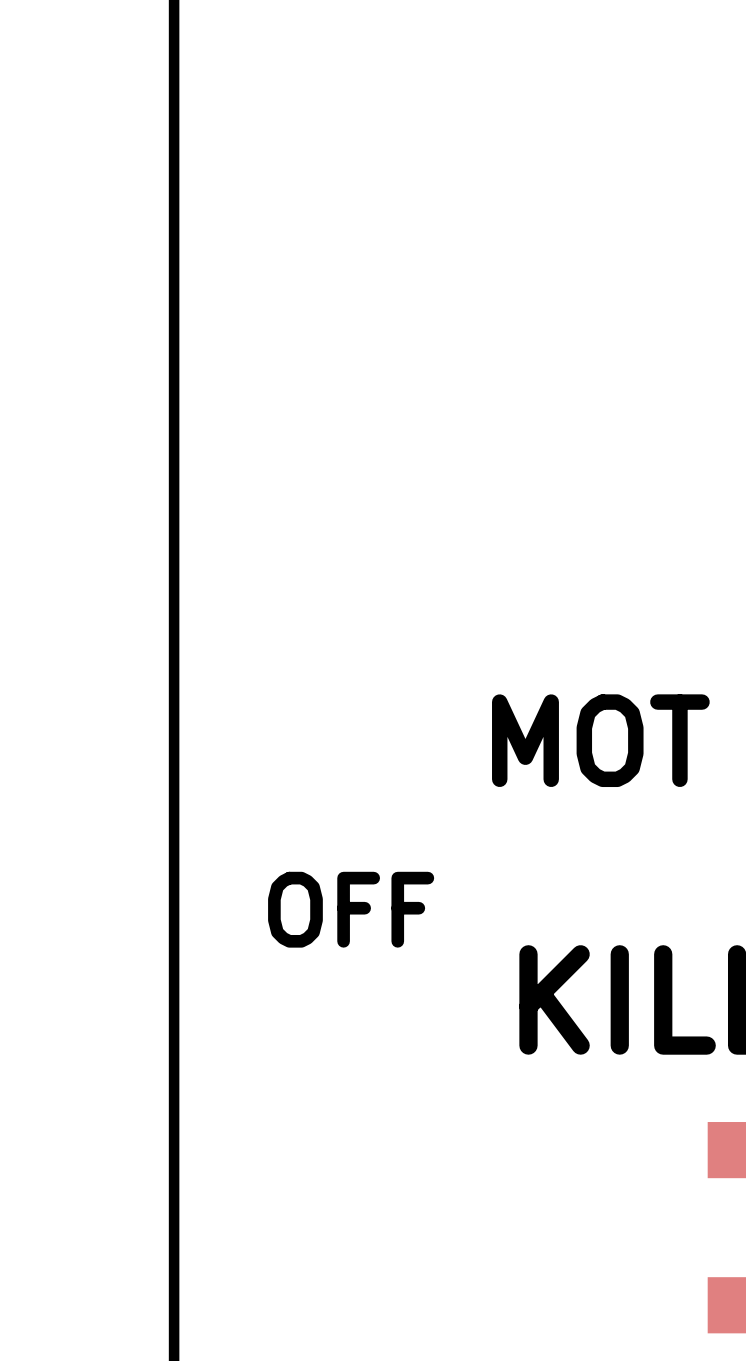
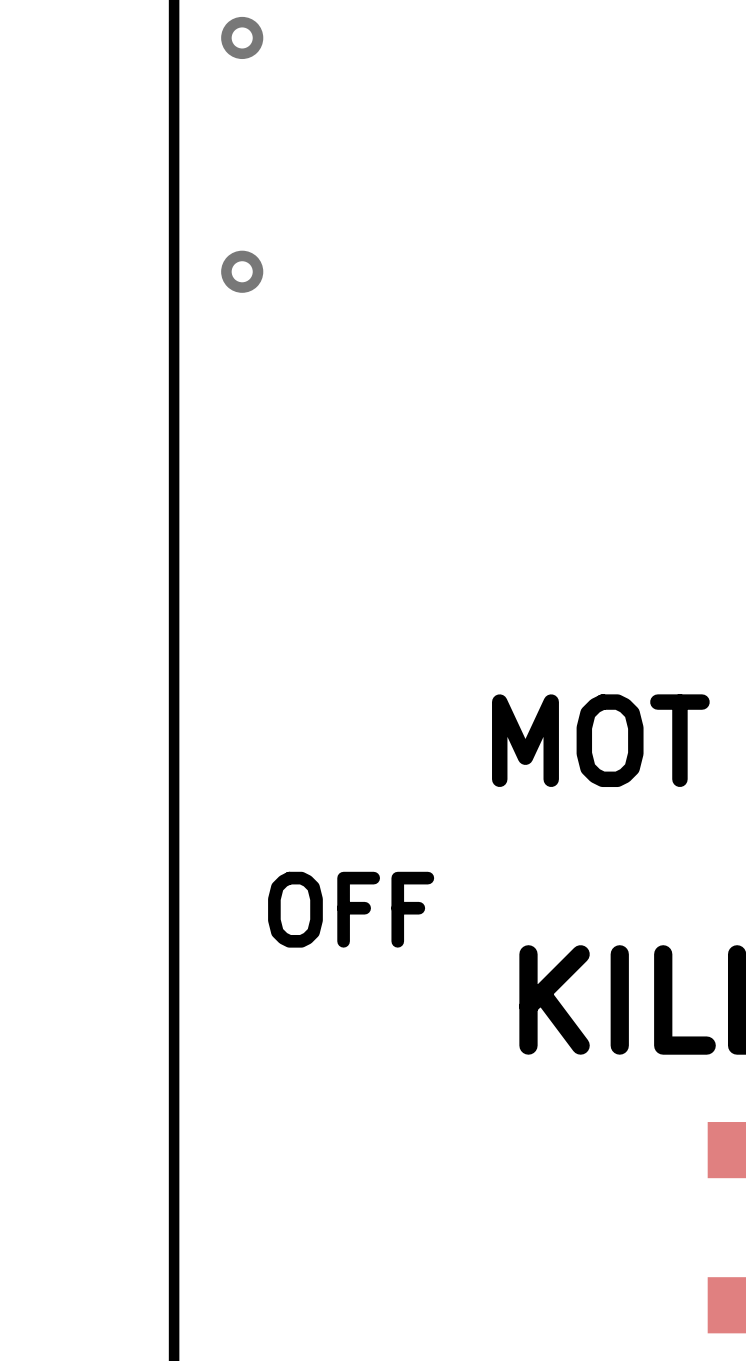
via: none -> (242, 37)
via: none -> (242, 271)

